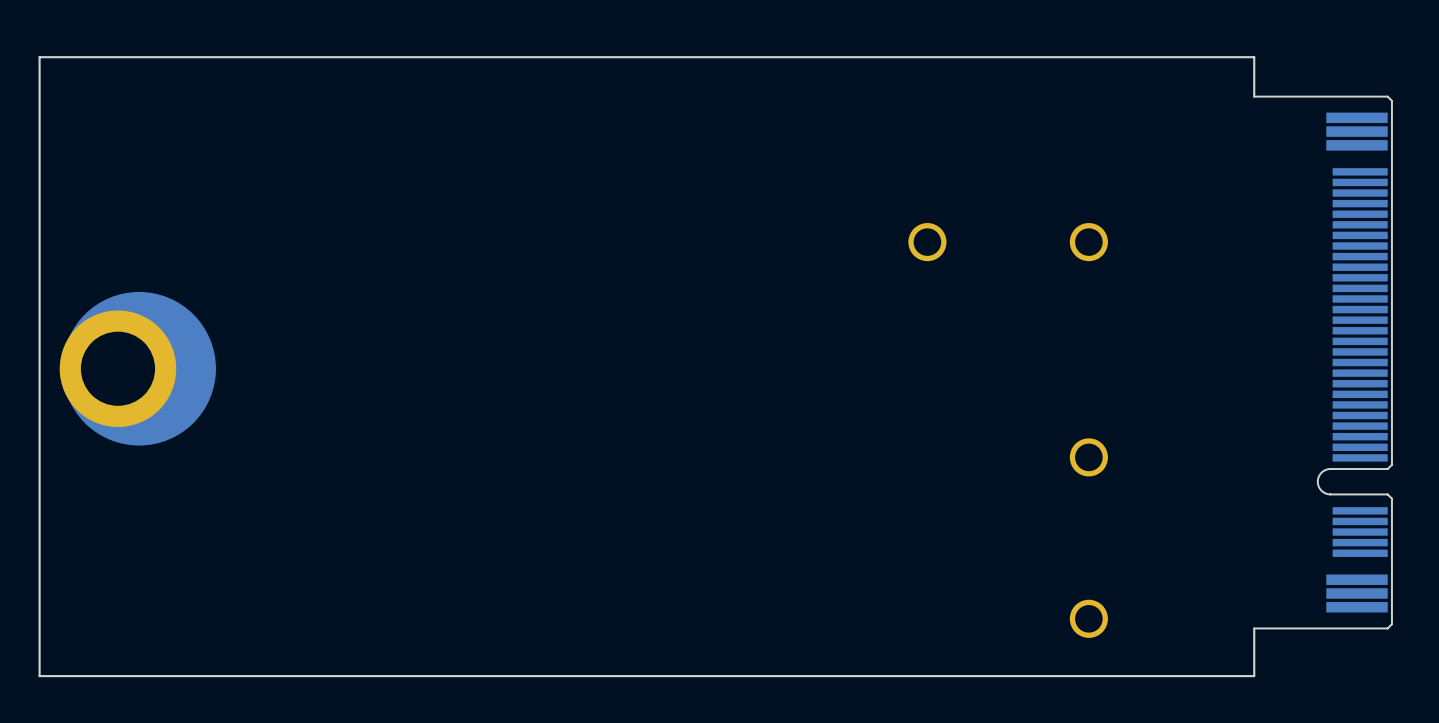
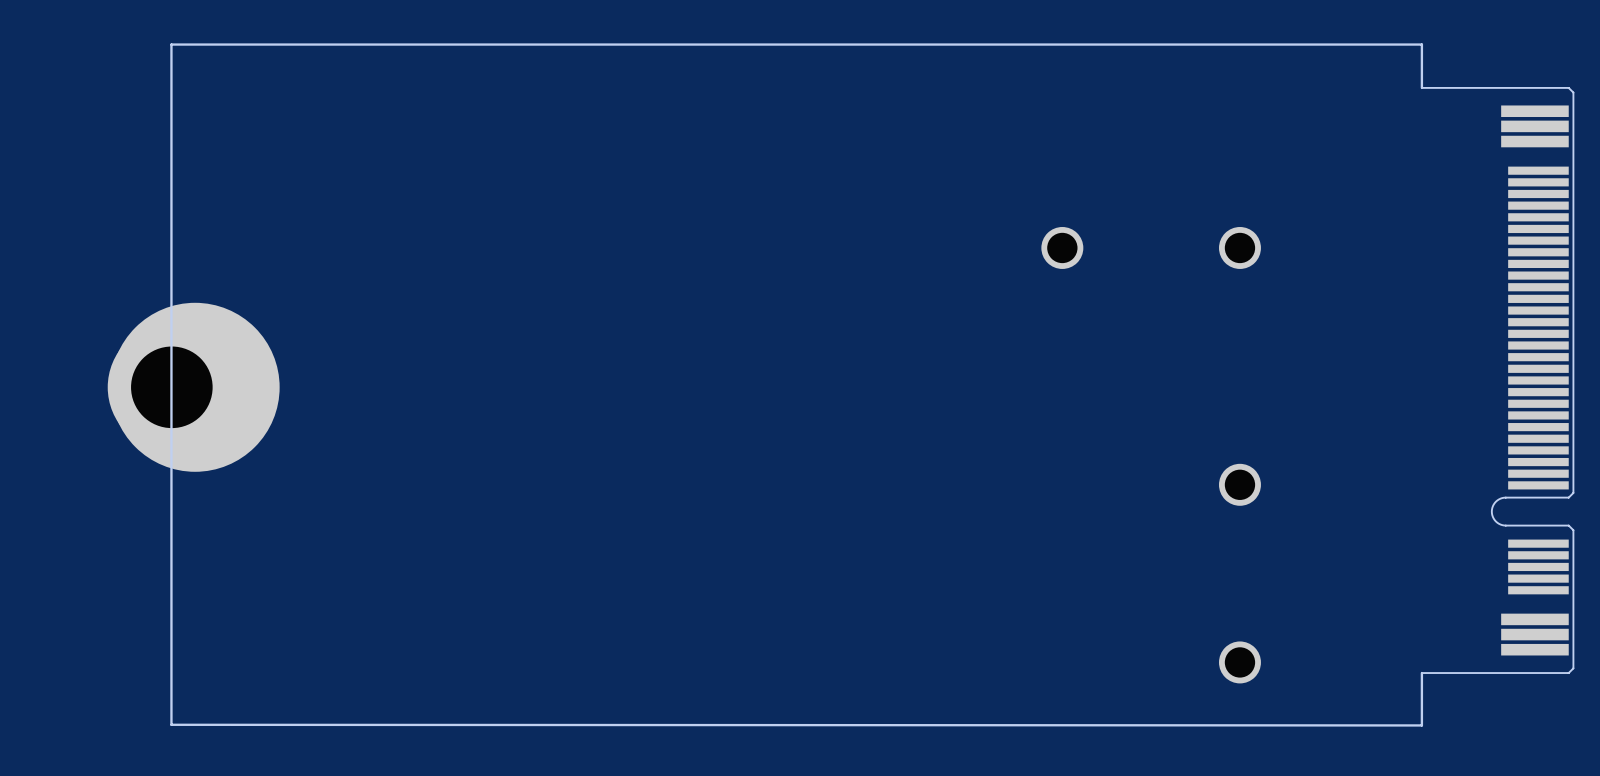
board edge: (117, 57) (39, 57) (39, 676) (1254, 676) -> (171, 44) (171, 724) (1421, 725)

